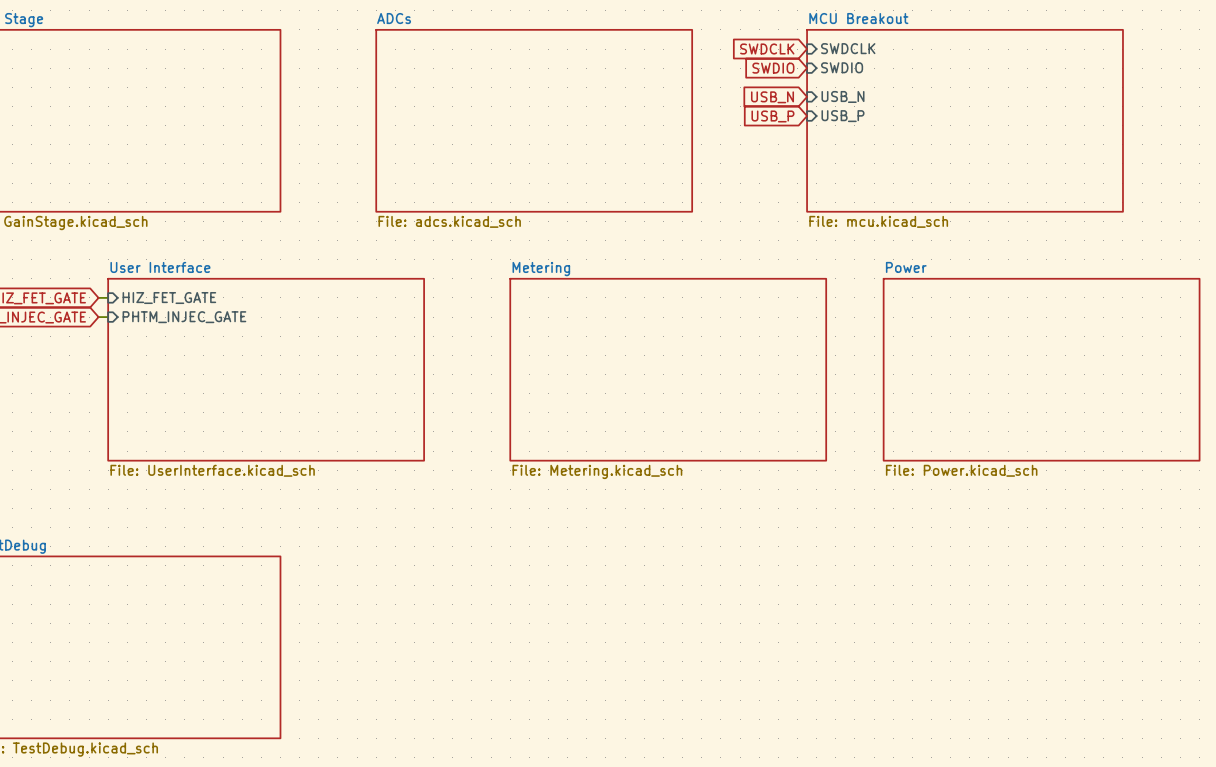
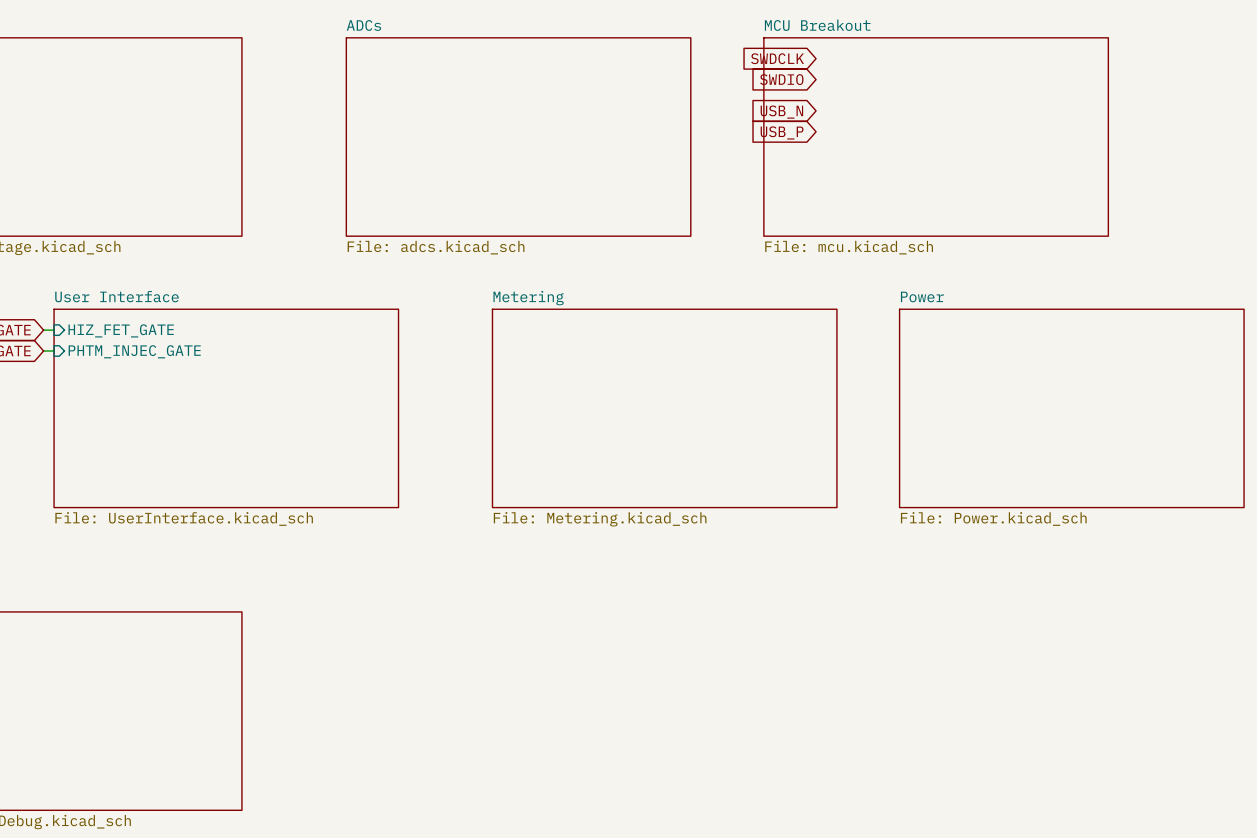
sheet pin: SWDCLK (848, 48) -> none
sheet pin: SWDIO (842, 67) -> none
sheet pin: USB_N (842, 96) -> none
sheet pin: USB_P (842, 116) -> none
sheet MCU Breakout position: (965, 120) -> (936, 137)

